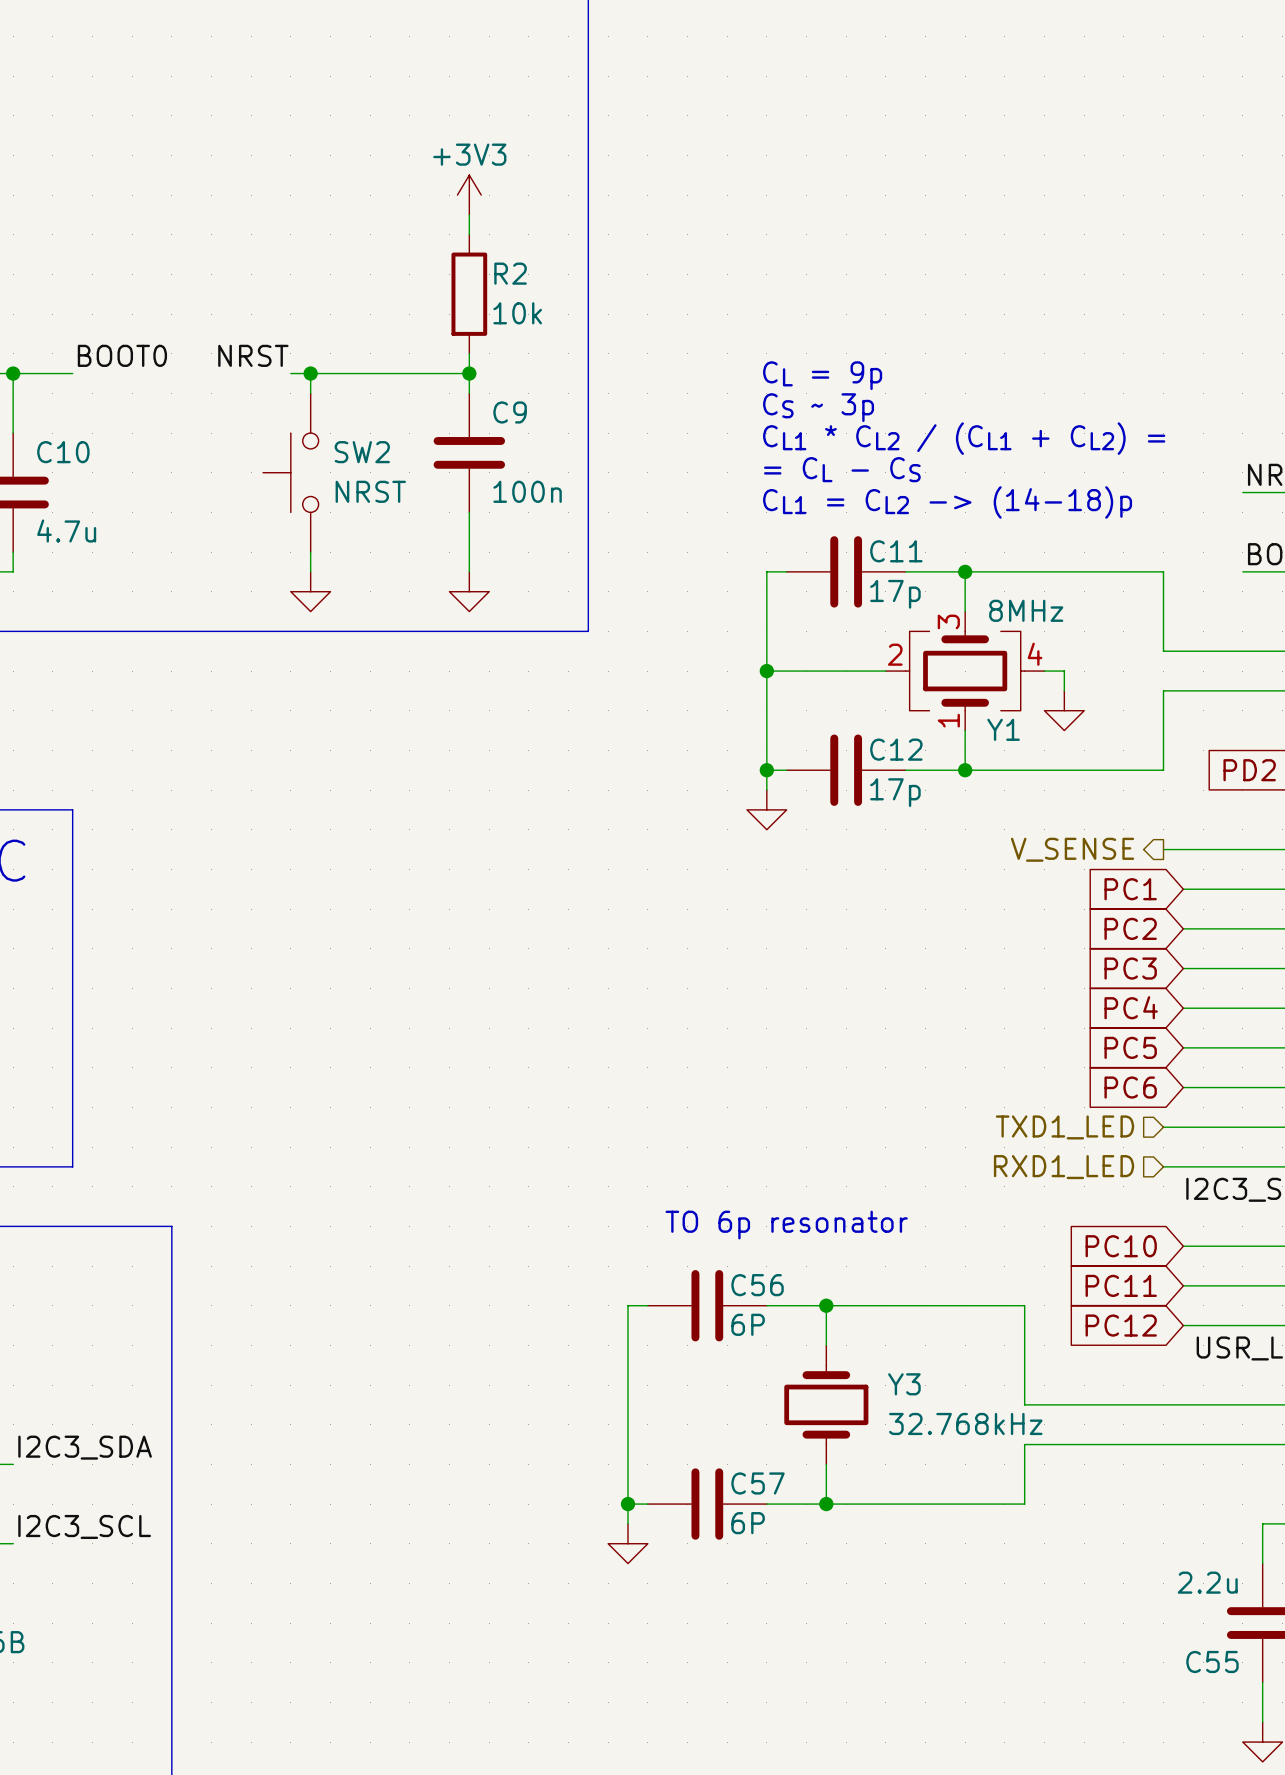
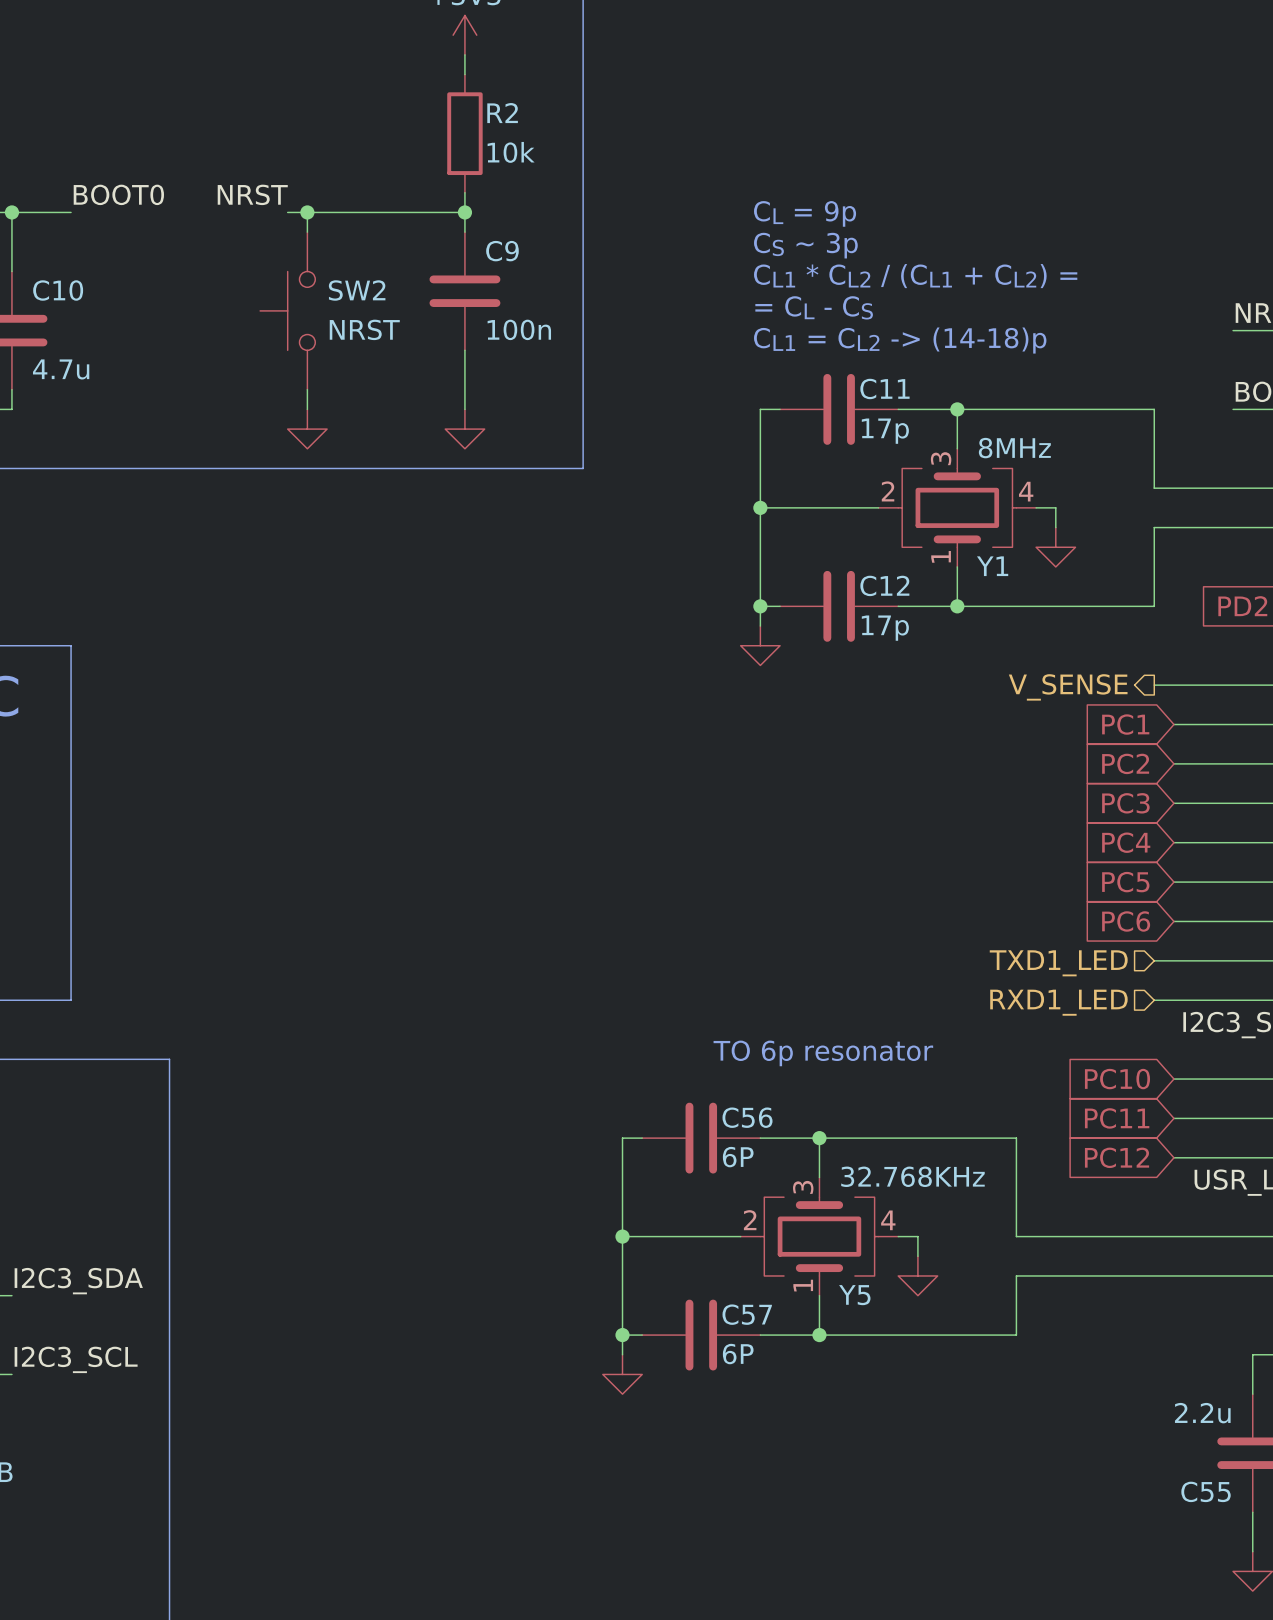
text position: TO 6p resonator (786, 1225) -> TO 6p resonator (823, 1053)
wire: none -> (622, 1236) (740, 1236)
junction: none -> (622, 1236)
Y3: 32.768kHz (826, 1404) -> none
Y5: none -> 32.768KHz (819, 1236)
wire: none -> (898, 1236) (917, 1236) (917, 1256)
power symbol: none -> (917, 1275)

